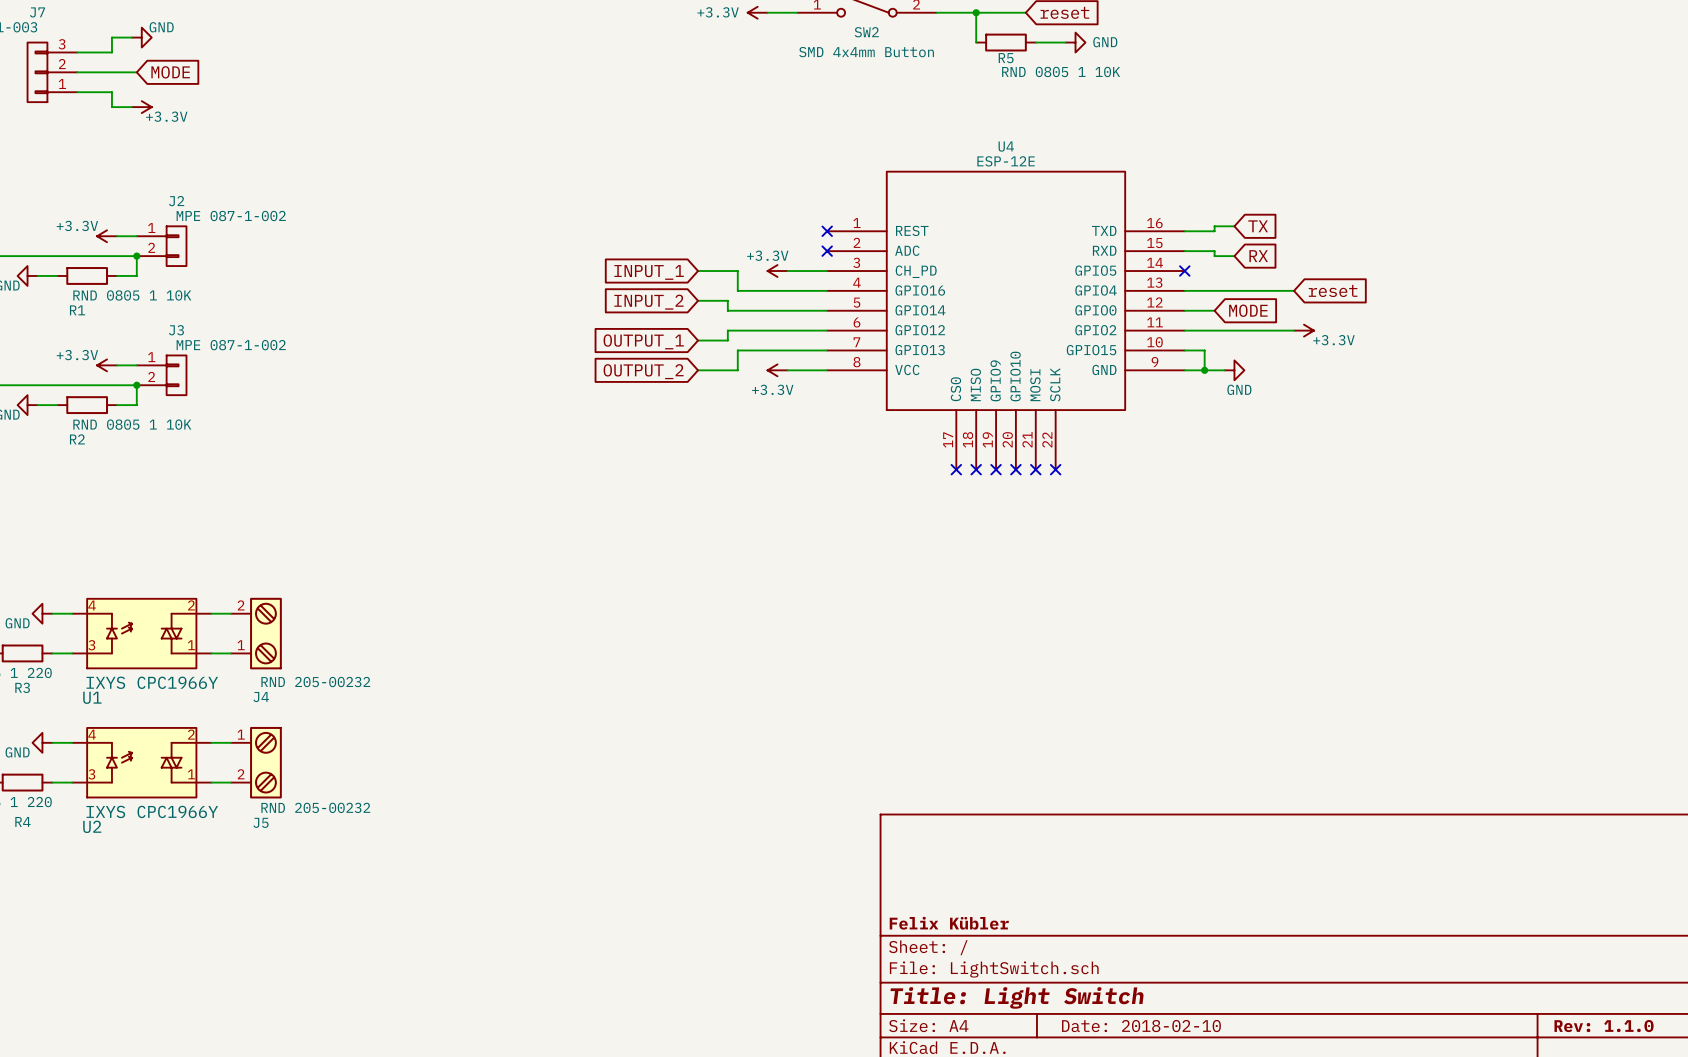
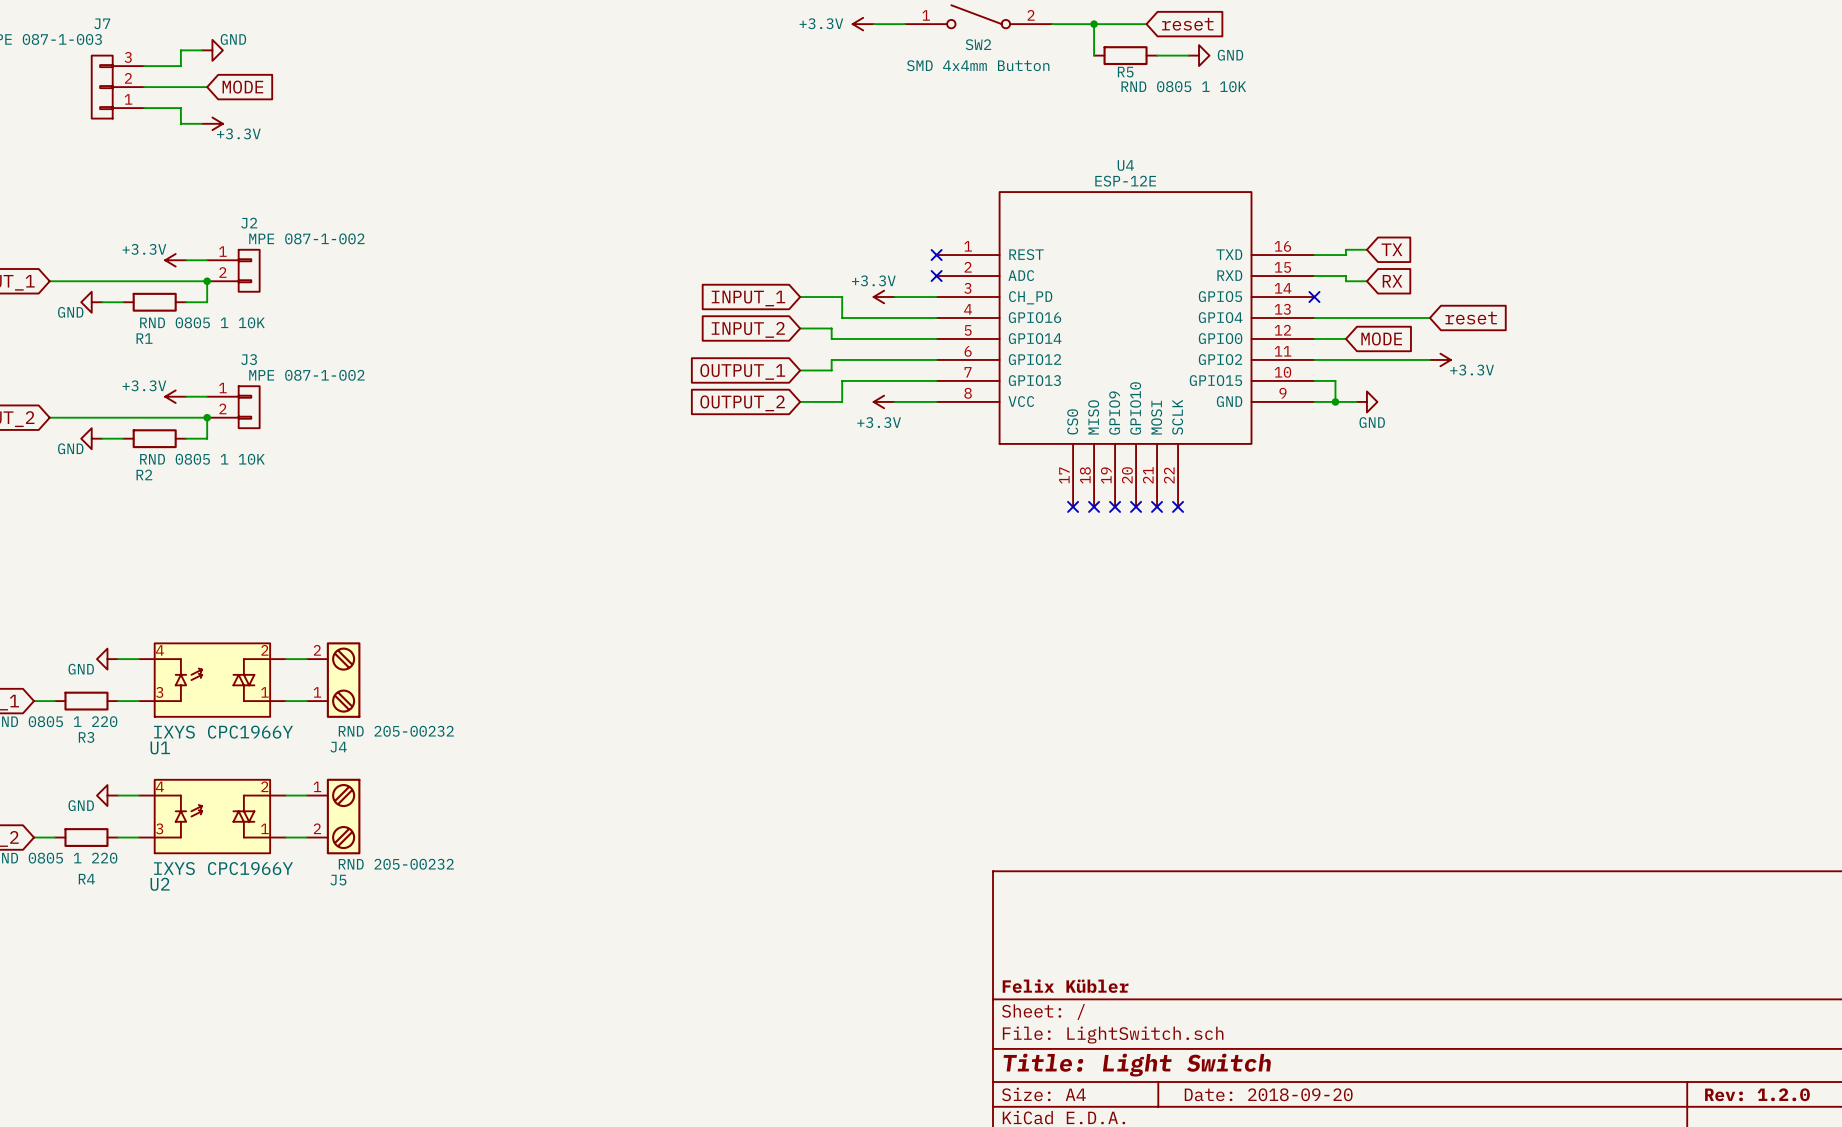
title block: Date: 2018-02-10 (1141, 1026) -> Date: 2018-09-20 (1268, 1094)
title block: Rev: 1.1.0 (1604, 1026) -> Rev: 1.2.0 (1757, 1094)

